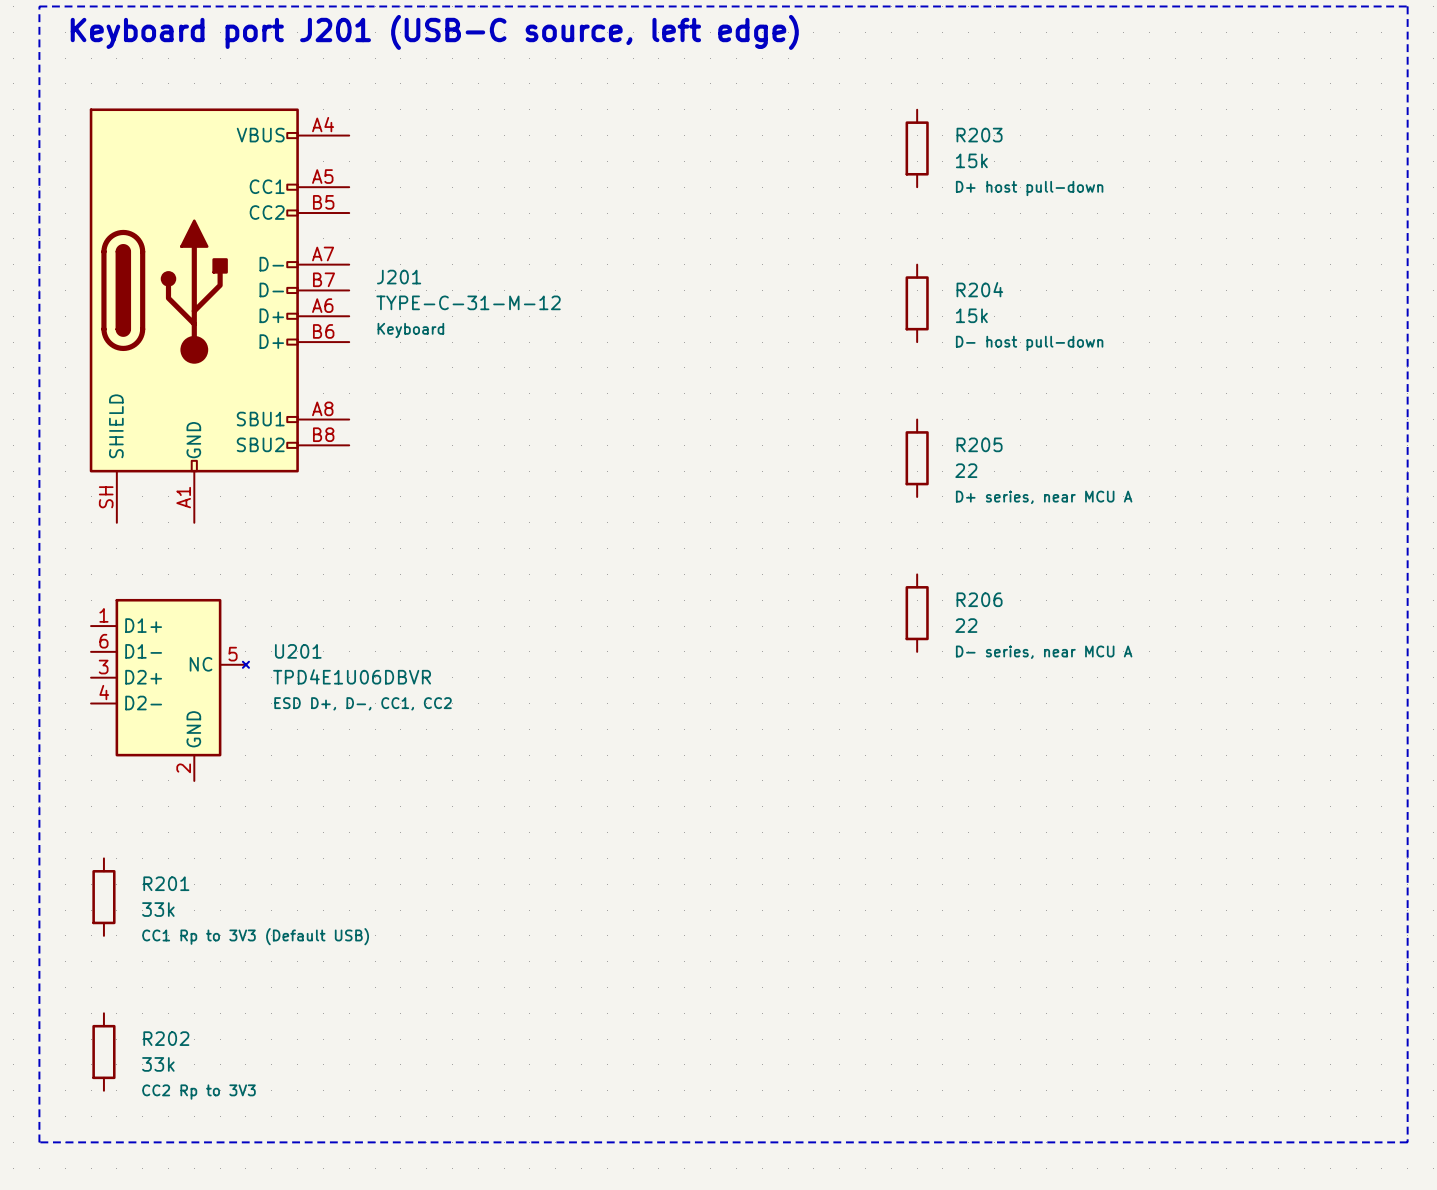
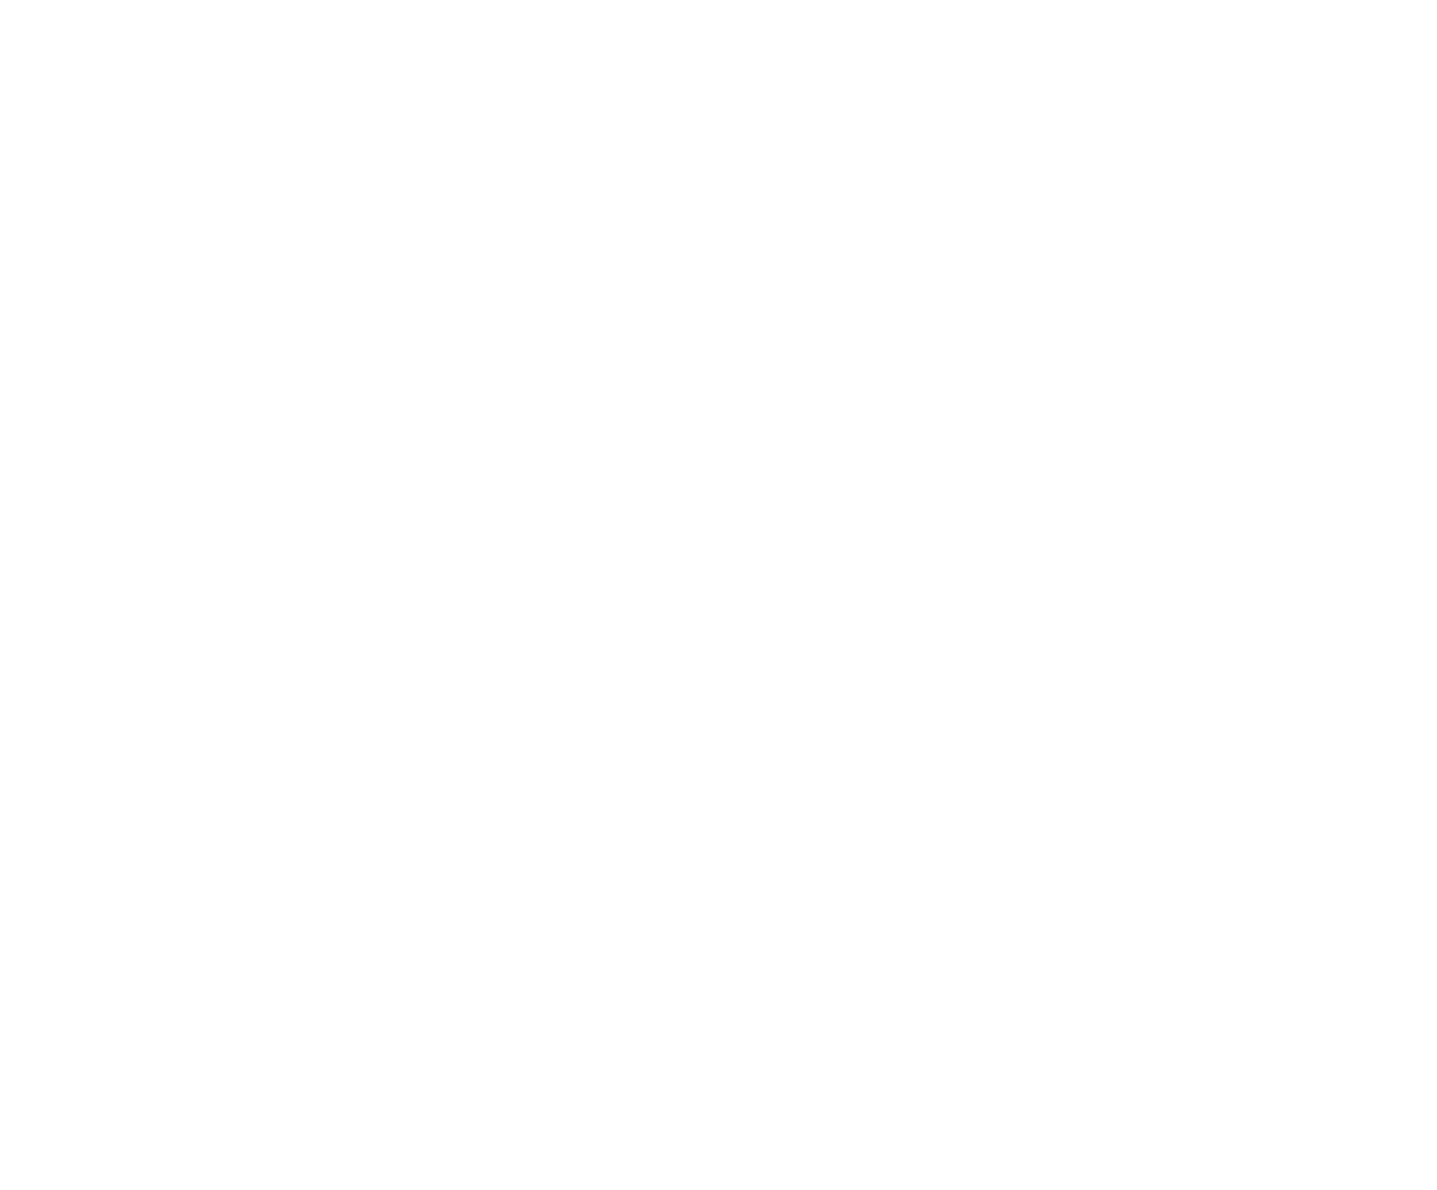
line: (39, 6) (1407, 6) (1407, 1142) (39, 1142) (39, 6) -> none
text: Keyboard port J201 (USB-C source, left edge) (434, 32) -> none
R203: 15k (917, 148) -> none
R204: 15k (917, 303) -> none
J201: TYPE-C-31-M-12 (219, 315) -> none
R205: 22 (917, 458) -> none
R206: 22 (917, 613) -> none
U201: TPD4E1U06DBVR (170, 689) -> none
R201: 33k (103, 897) -> none
R202: 33k (103, 1052) -> none

